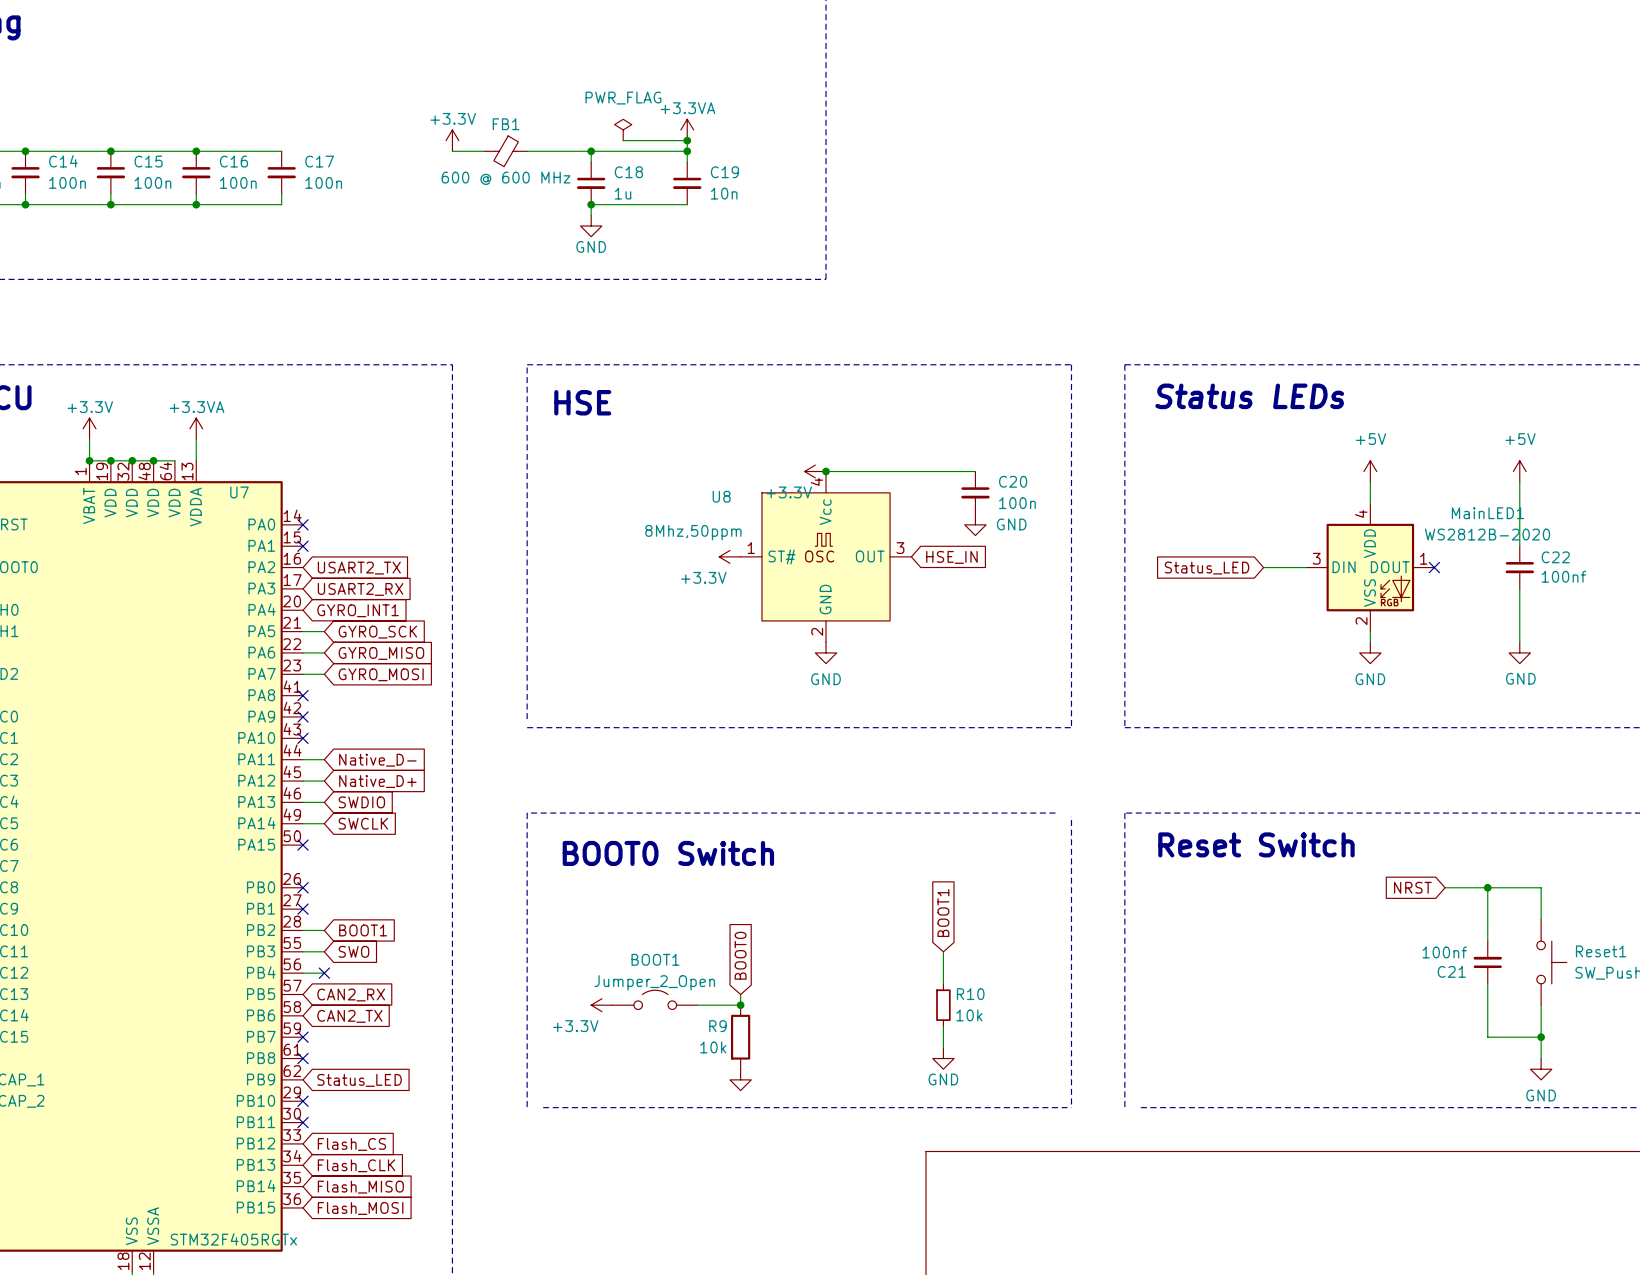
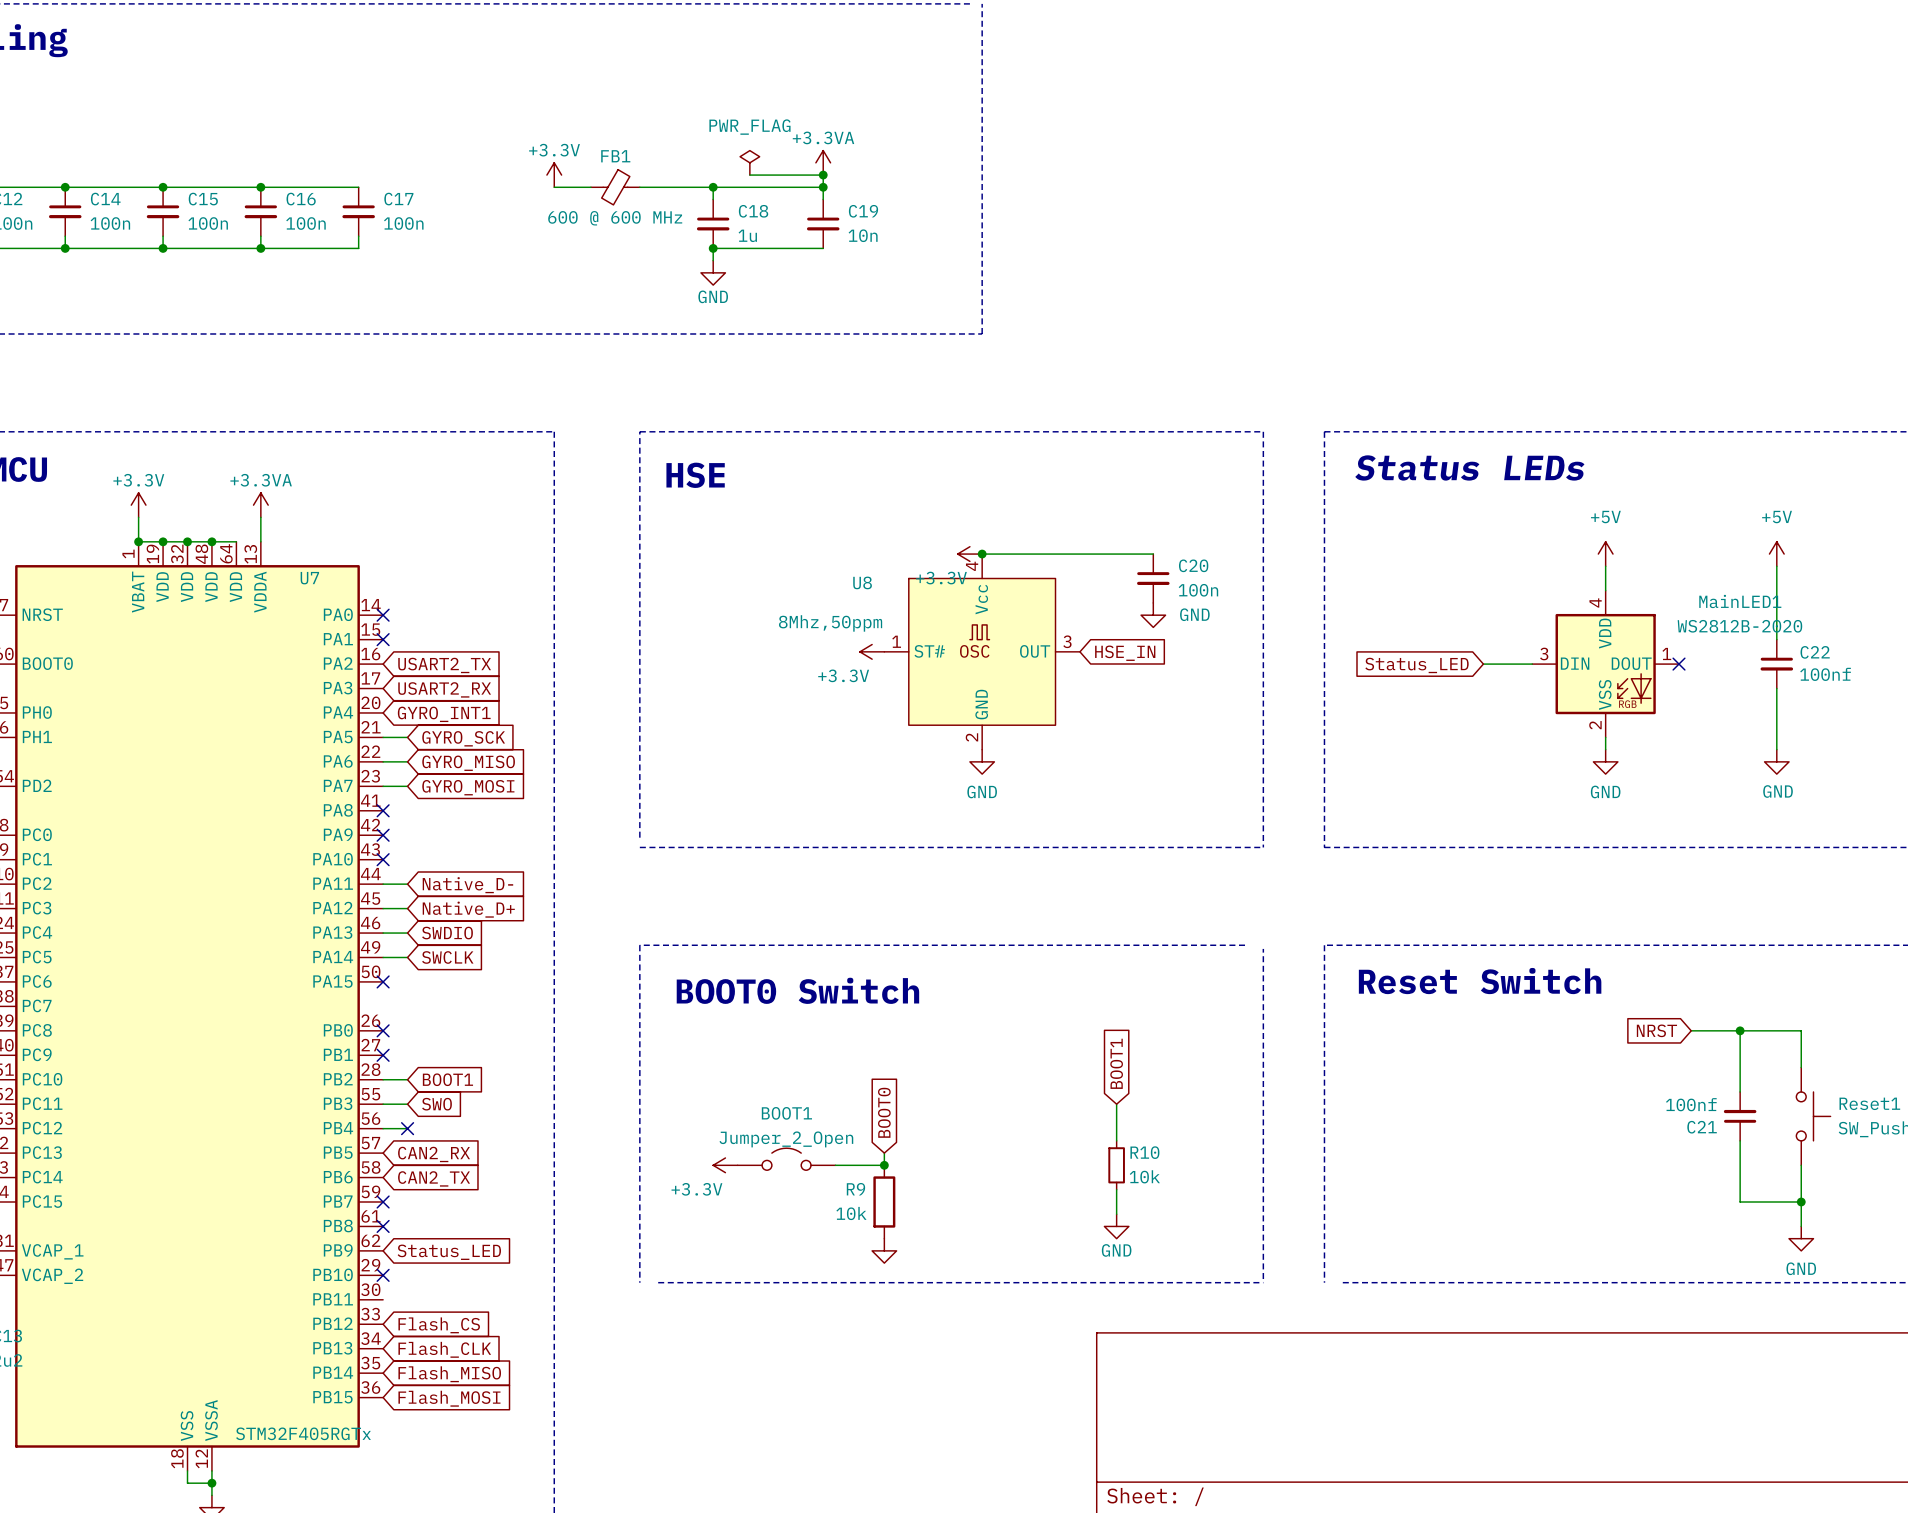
no-connect mark: (303, 1122) -> none

